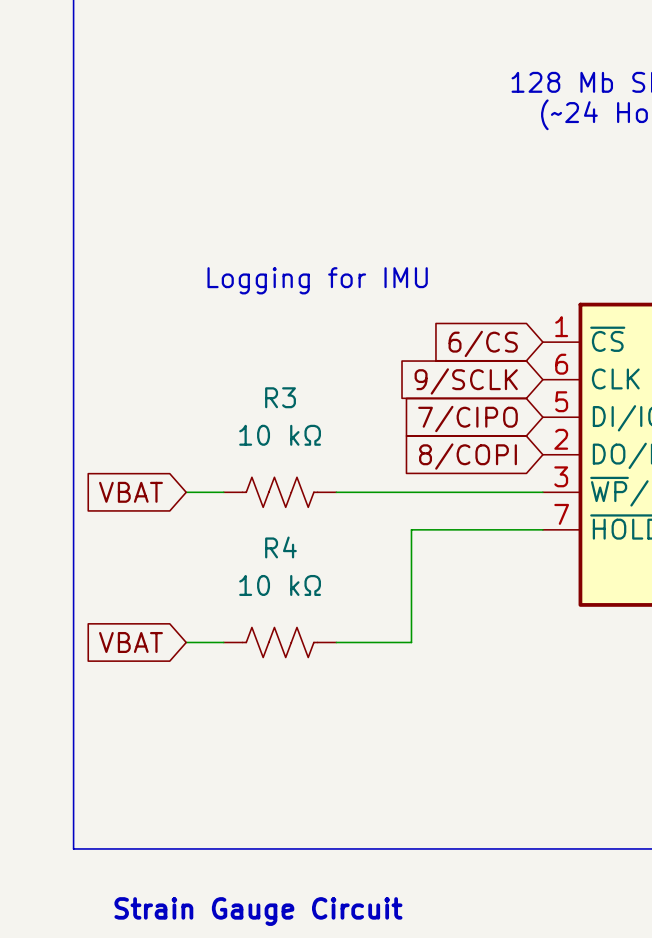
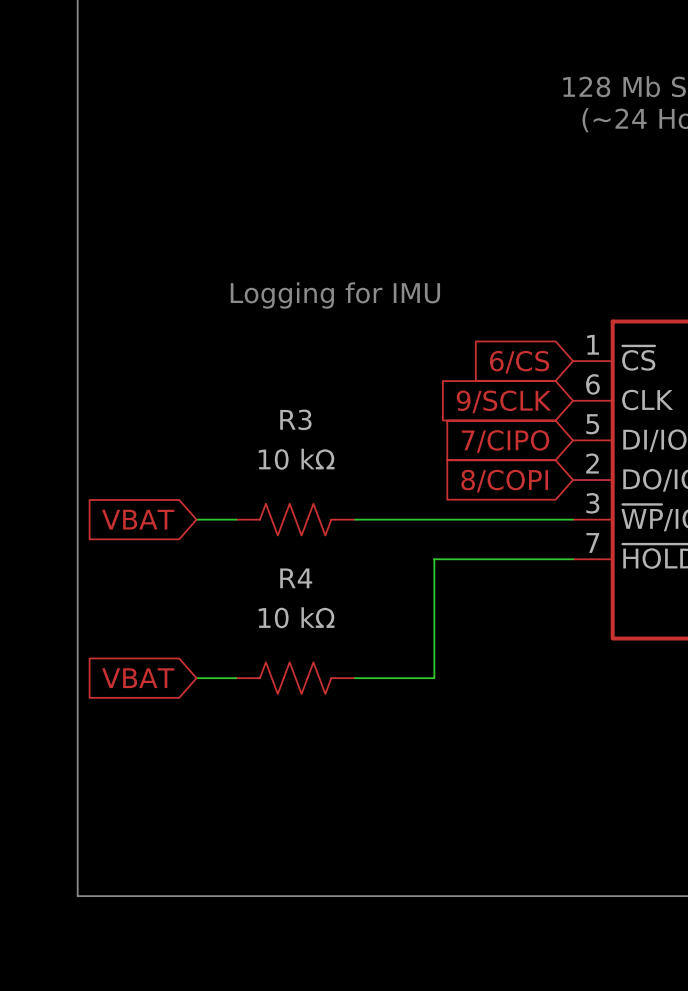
text: Strain Gauge Circuit (258, 911) -> none

